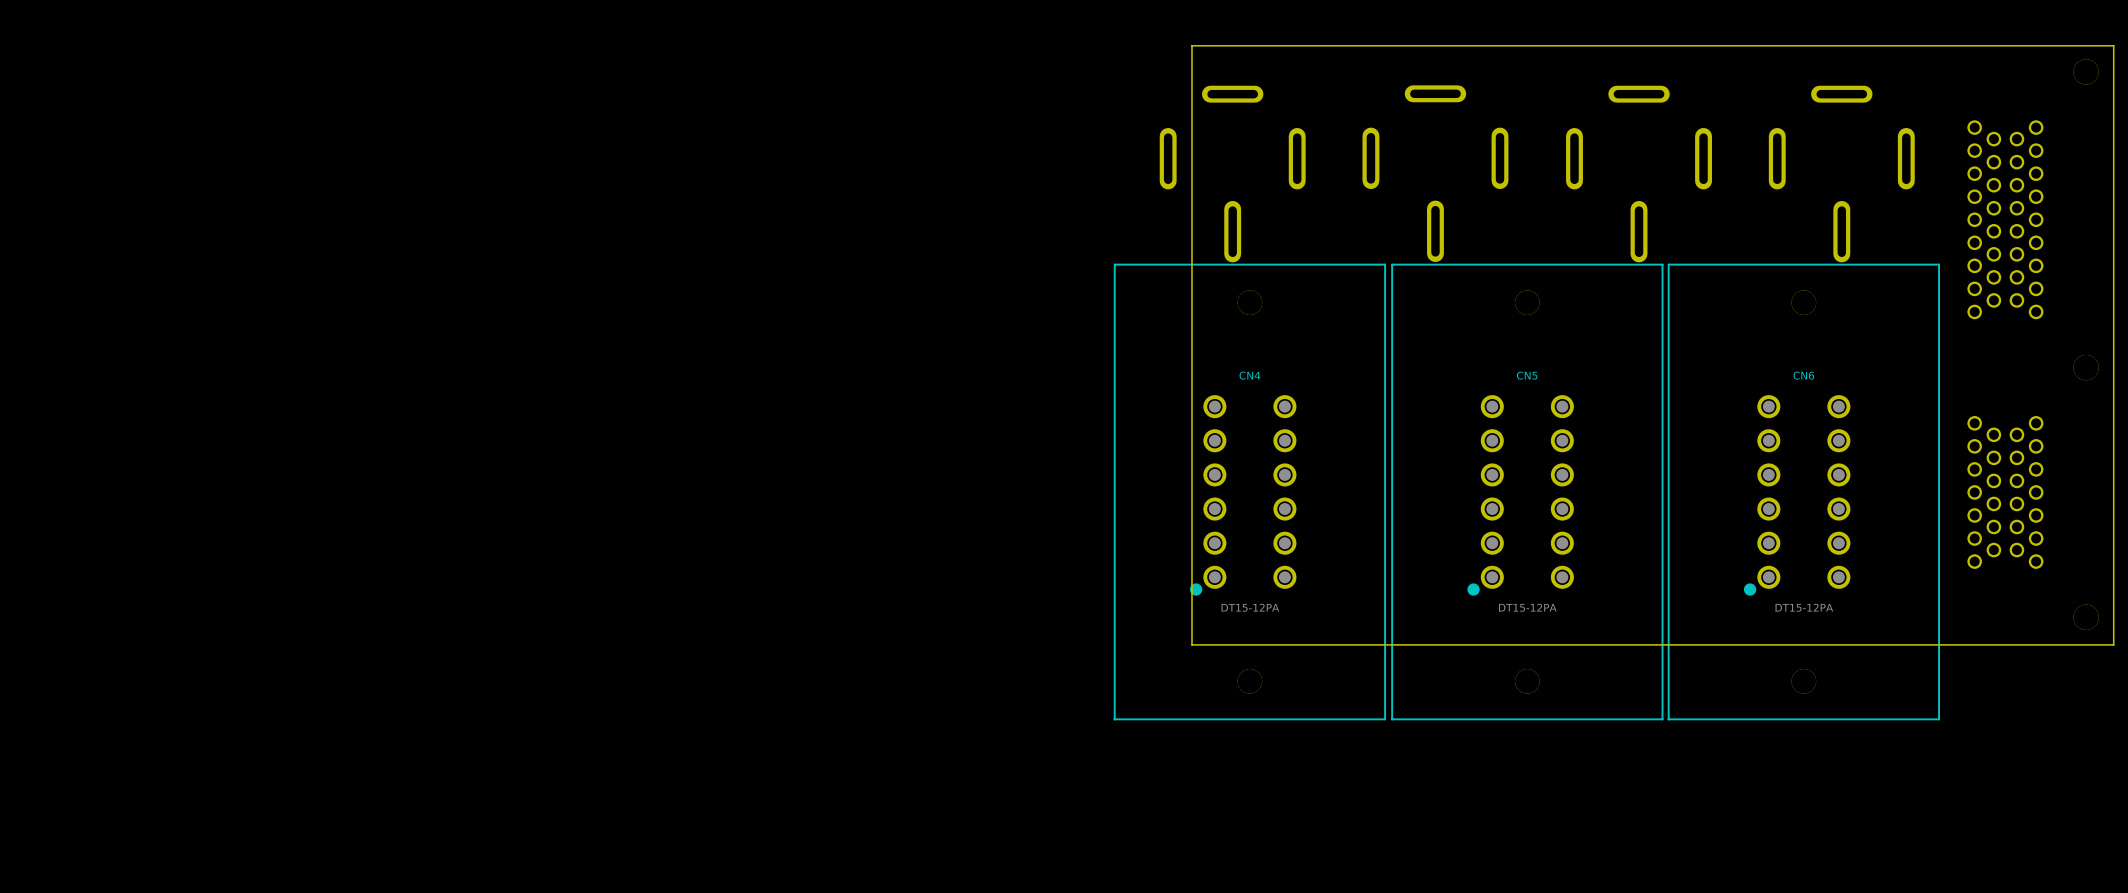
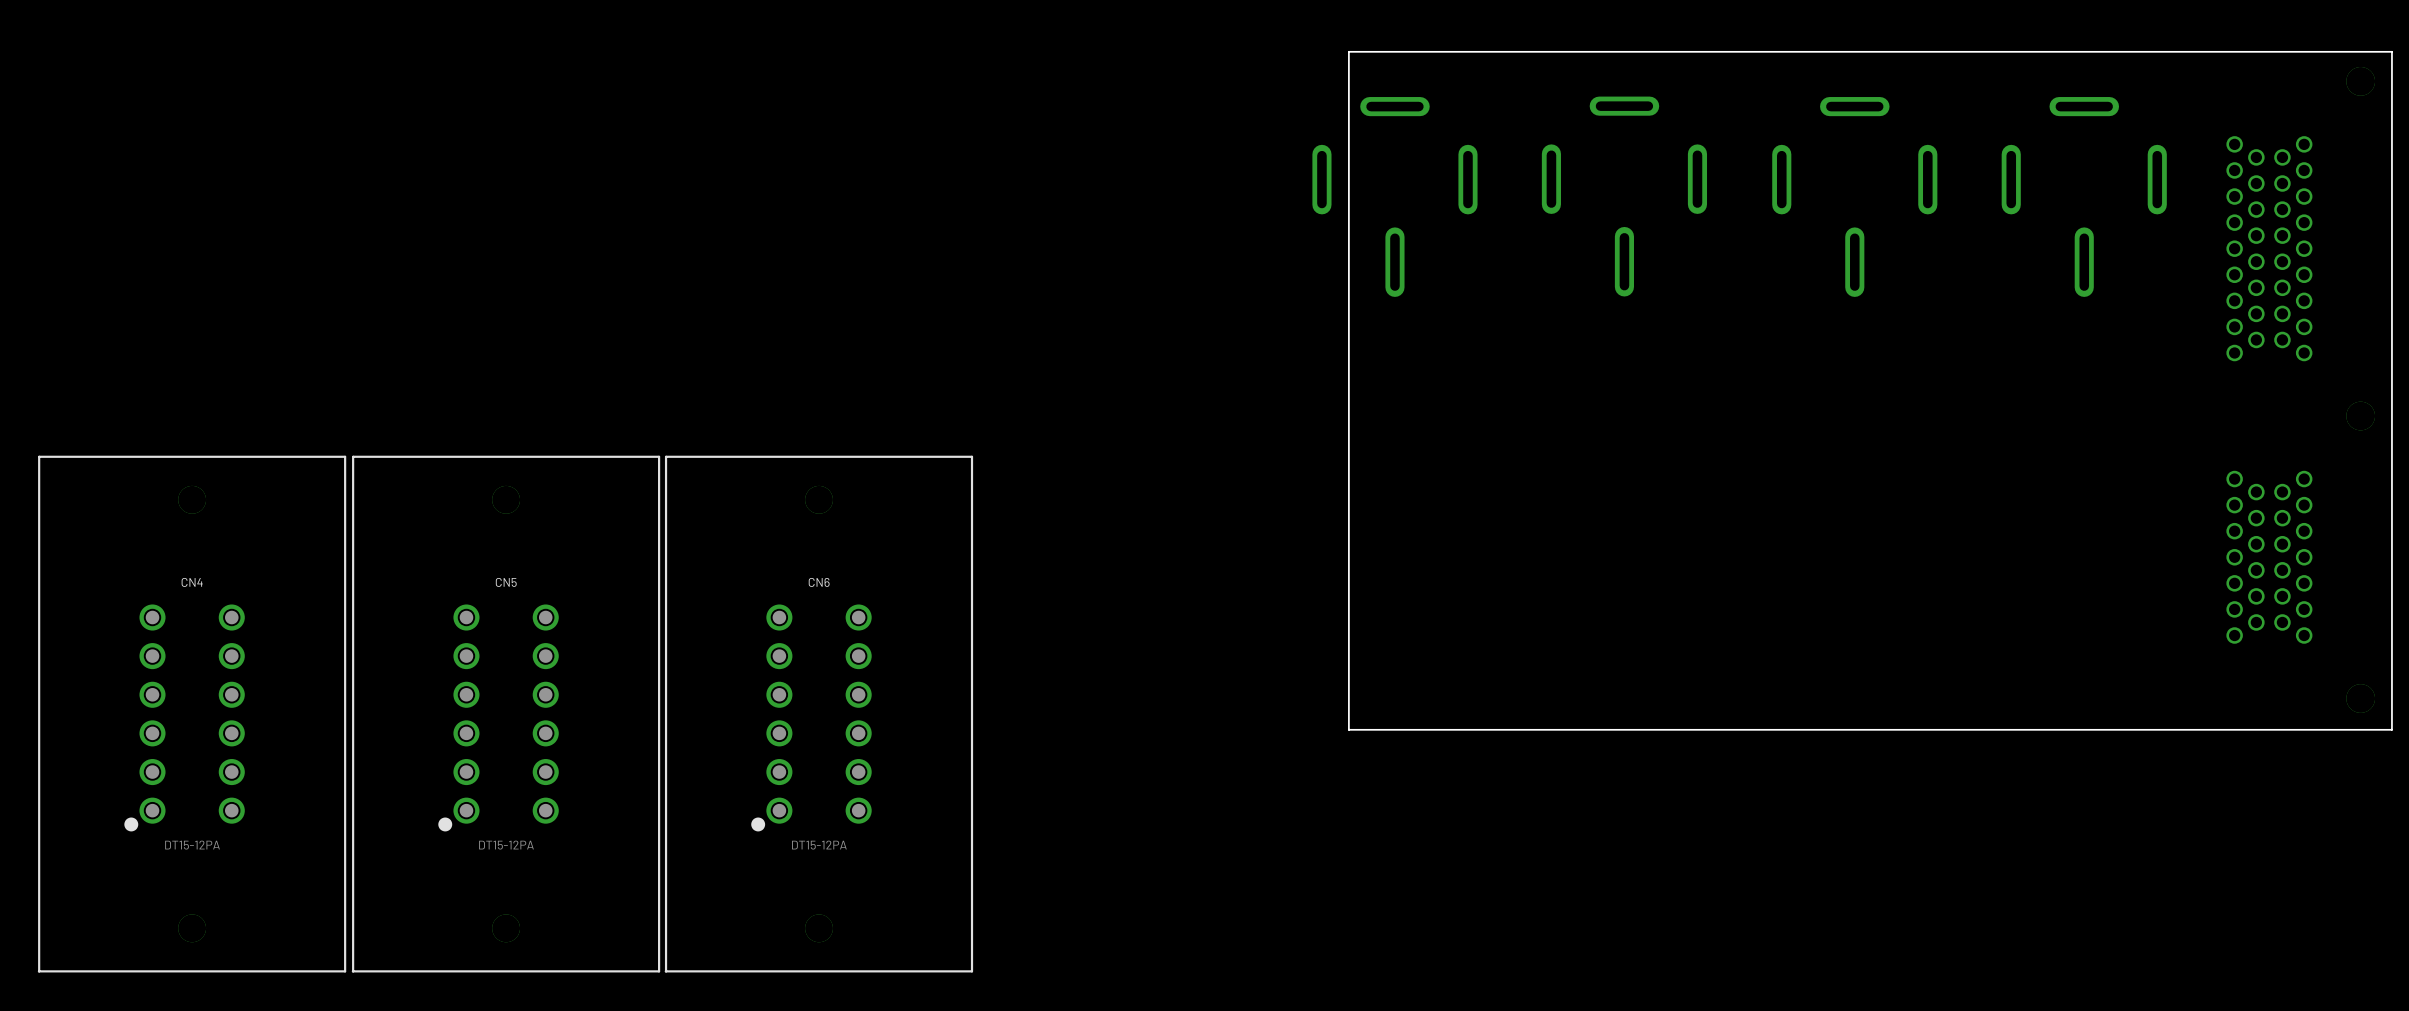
CN4 position: (1249, 491) -> (192, 714)
CN5 position: (1527, 491) -> (506, 714)
CN6 position: (1803, 491) -> (819, 714)

